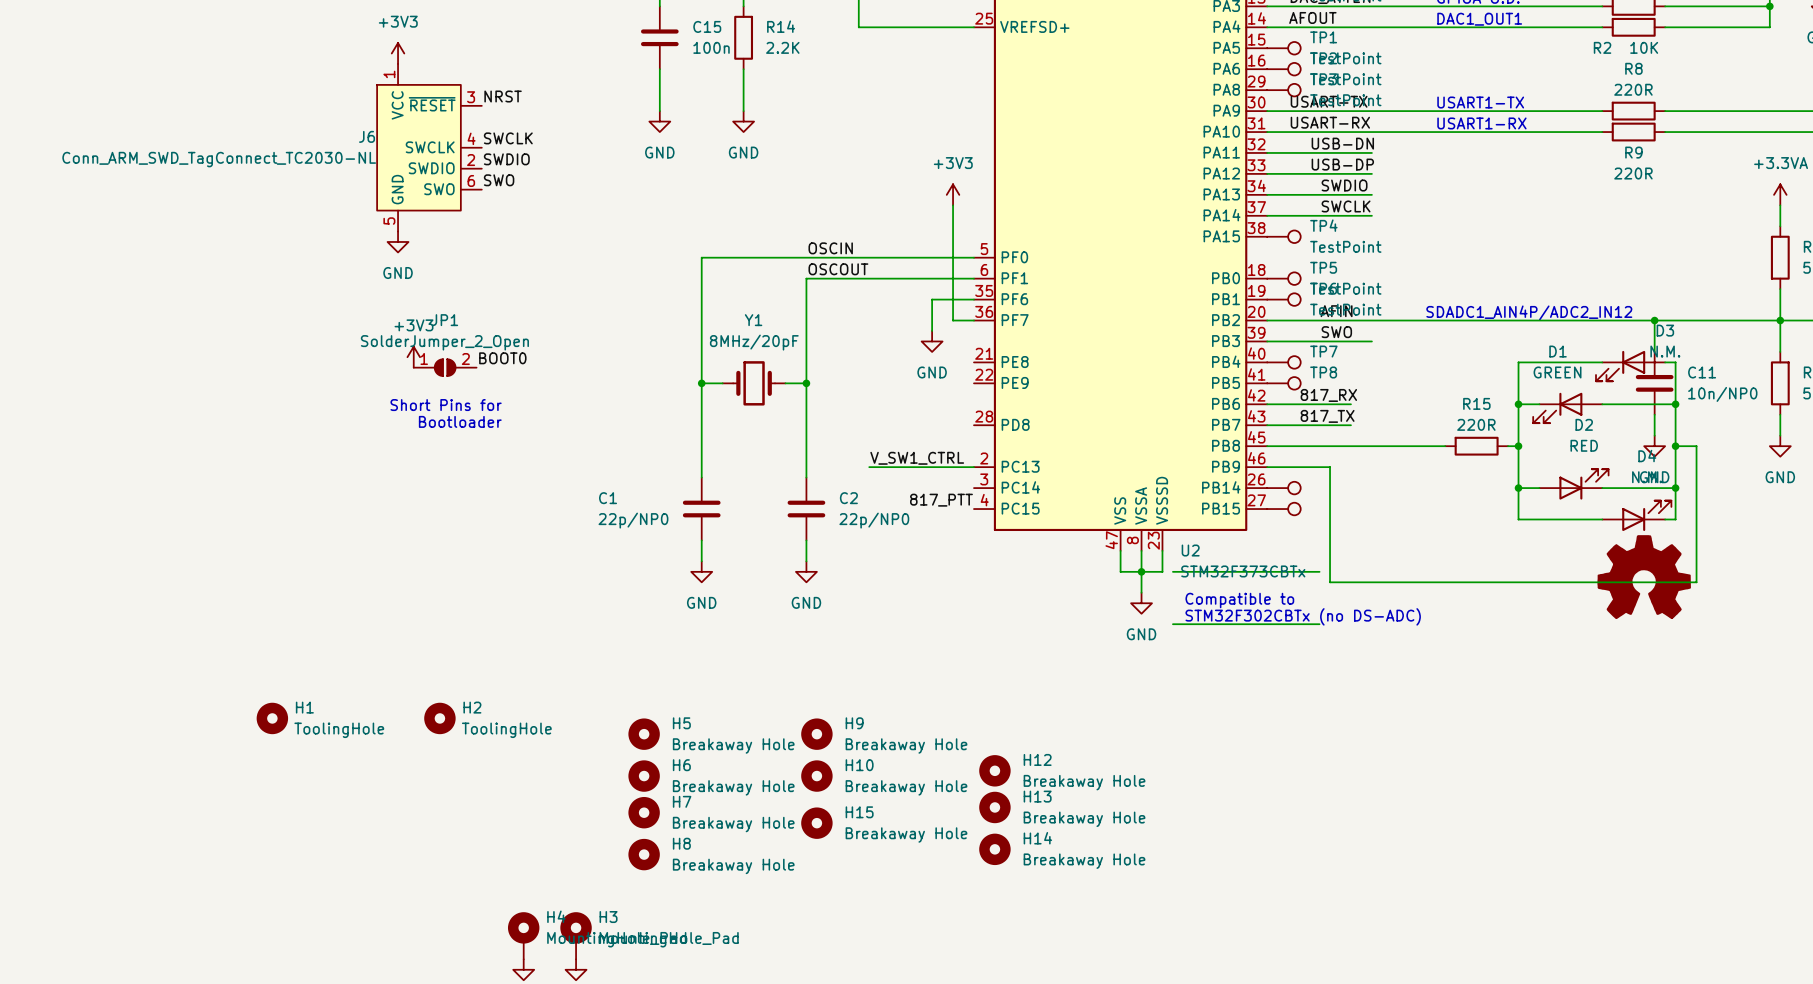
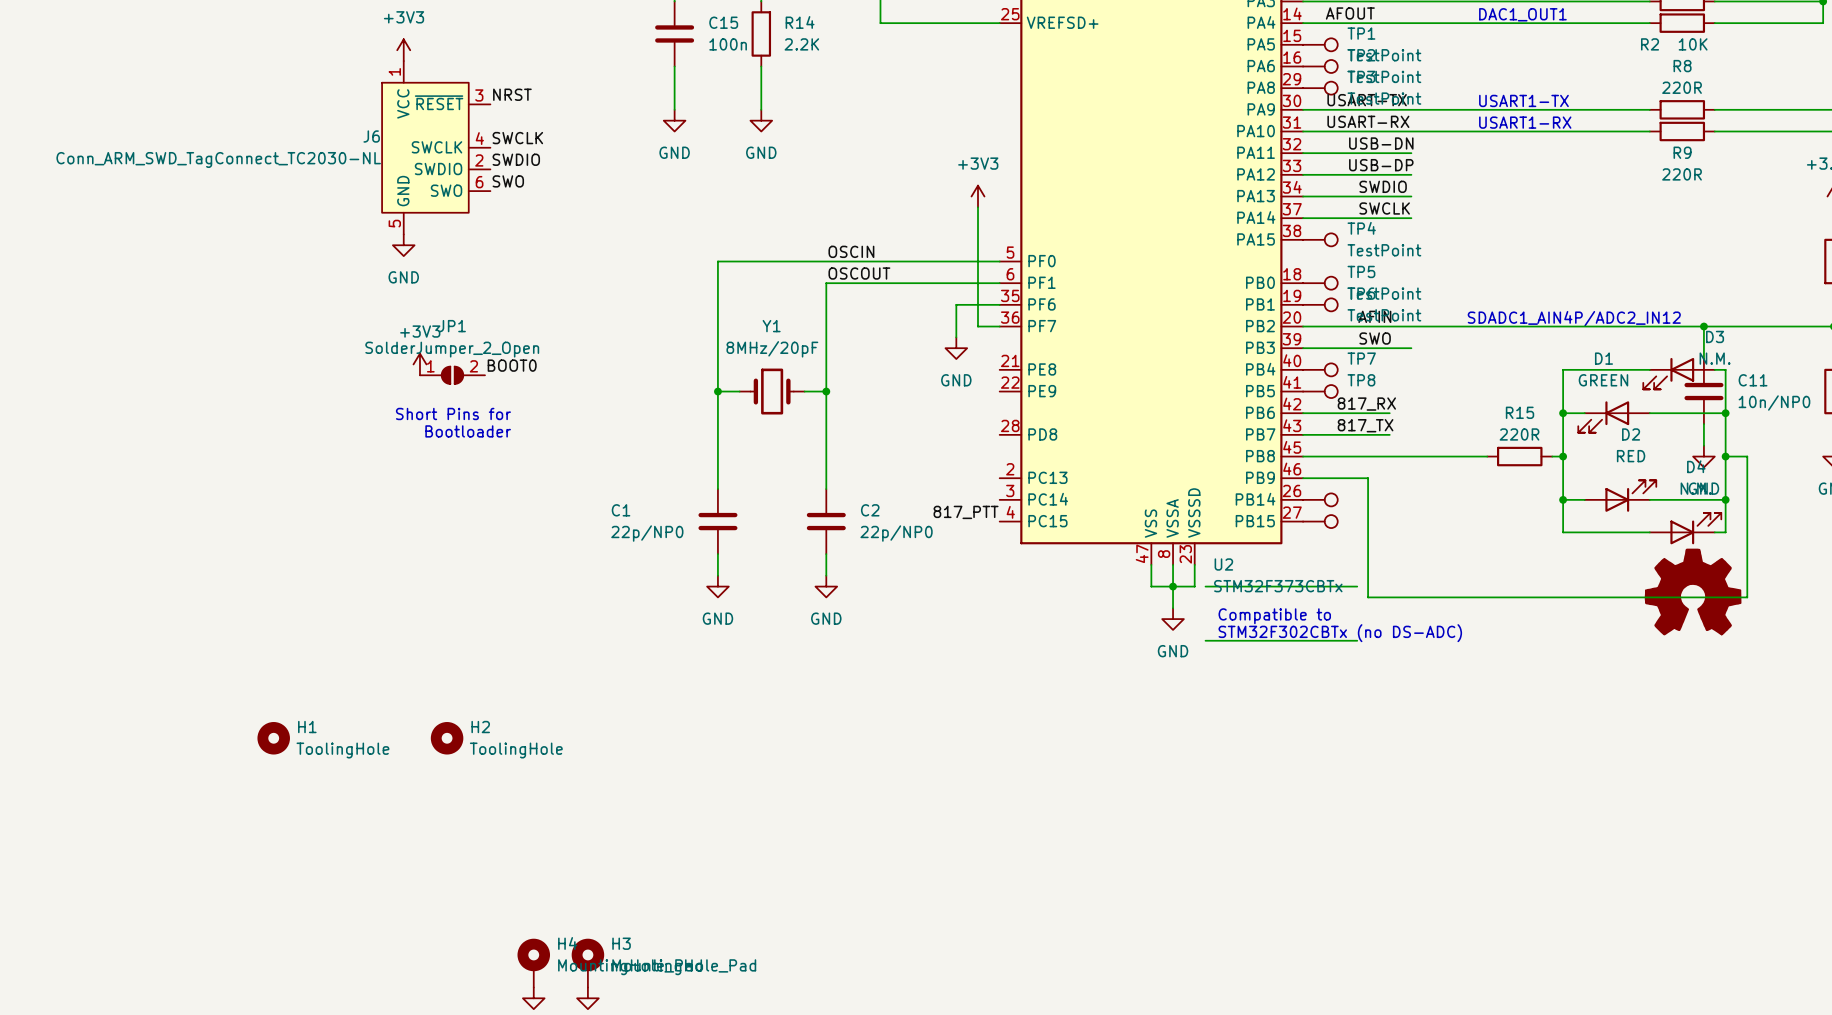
label: V_SW1_CTRL (917, 458) -> none
wire: (869, 467) (973, 467) -> none
H5: Breakaway Hole (644, 734) -> none
H9: Breakaway Hole (816, 734) -> none
H12: Breakaway Hole (994, 770) -> none
H6: Breakaway Hole (644, 776) -> none
H10: Breakaway Hole (816, 776) -> none
H13: Breakaway Hole (994, 807) -> none
H7: Breakaway Hole (644, 812) -> none
H15: Breakaway Hole (816, 823) -> none
H14: Breakaway Hole (994, 849) -> none
H8: Breakaway Hole (644, 854) -> none

